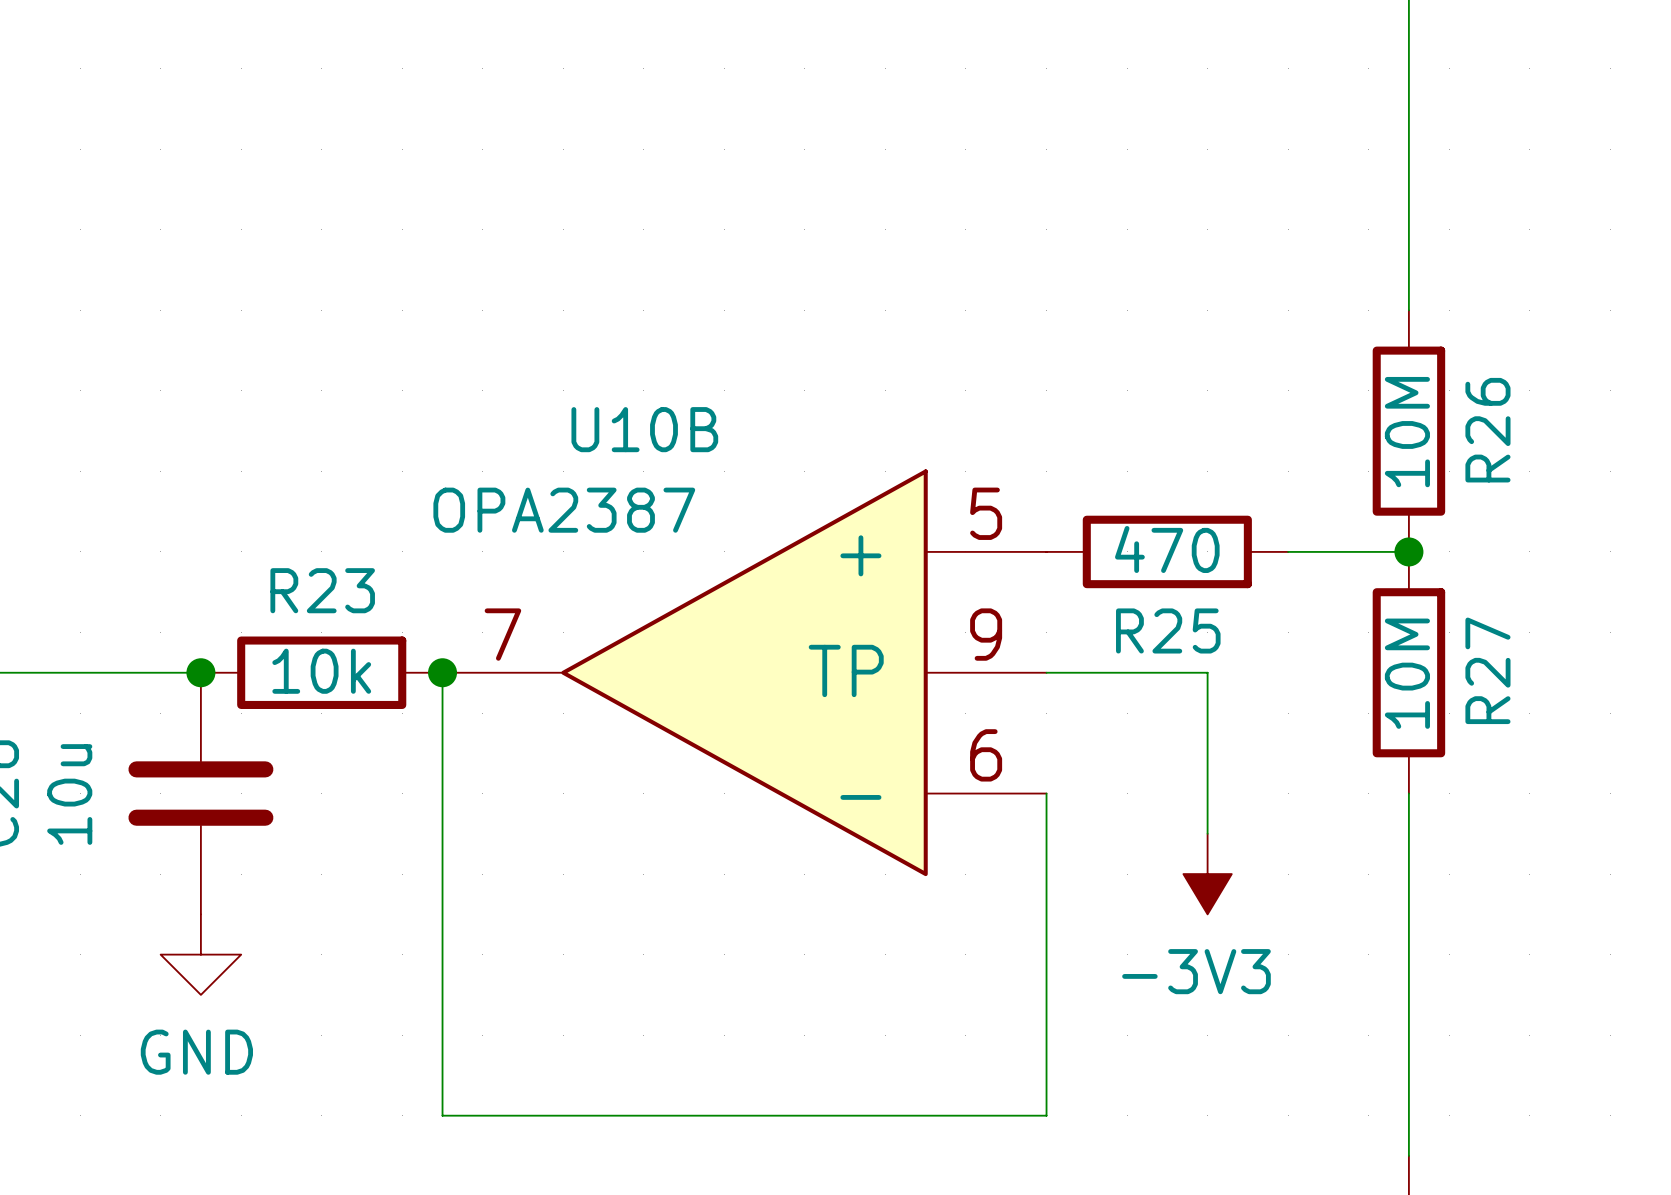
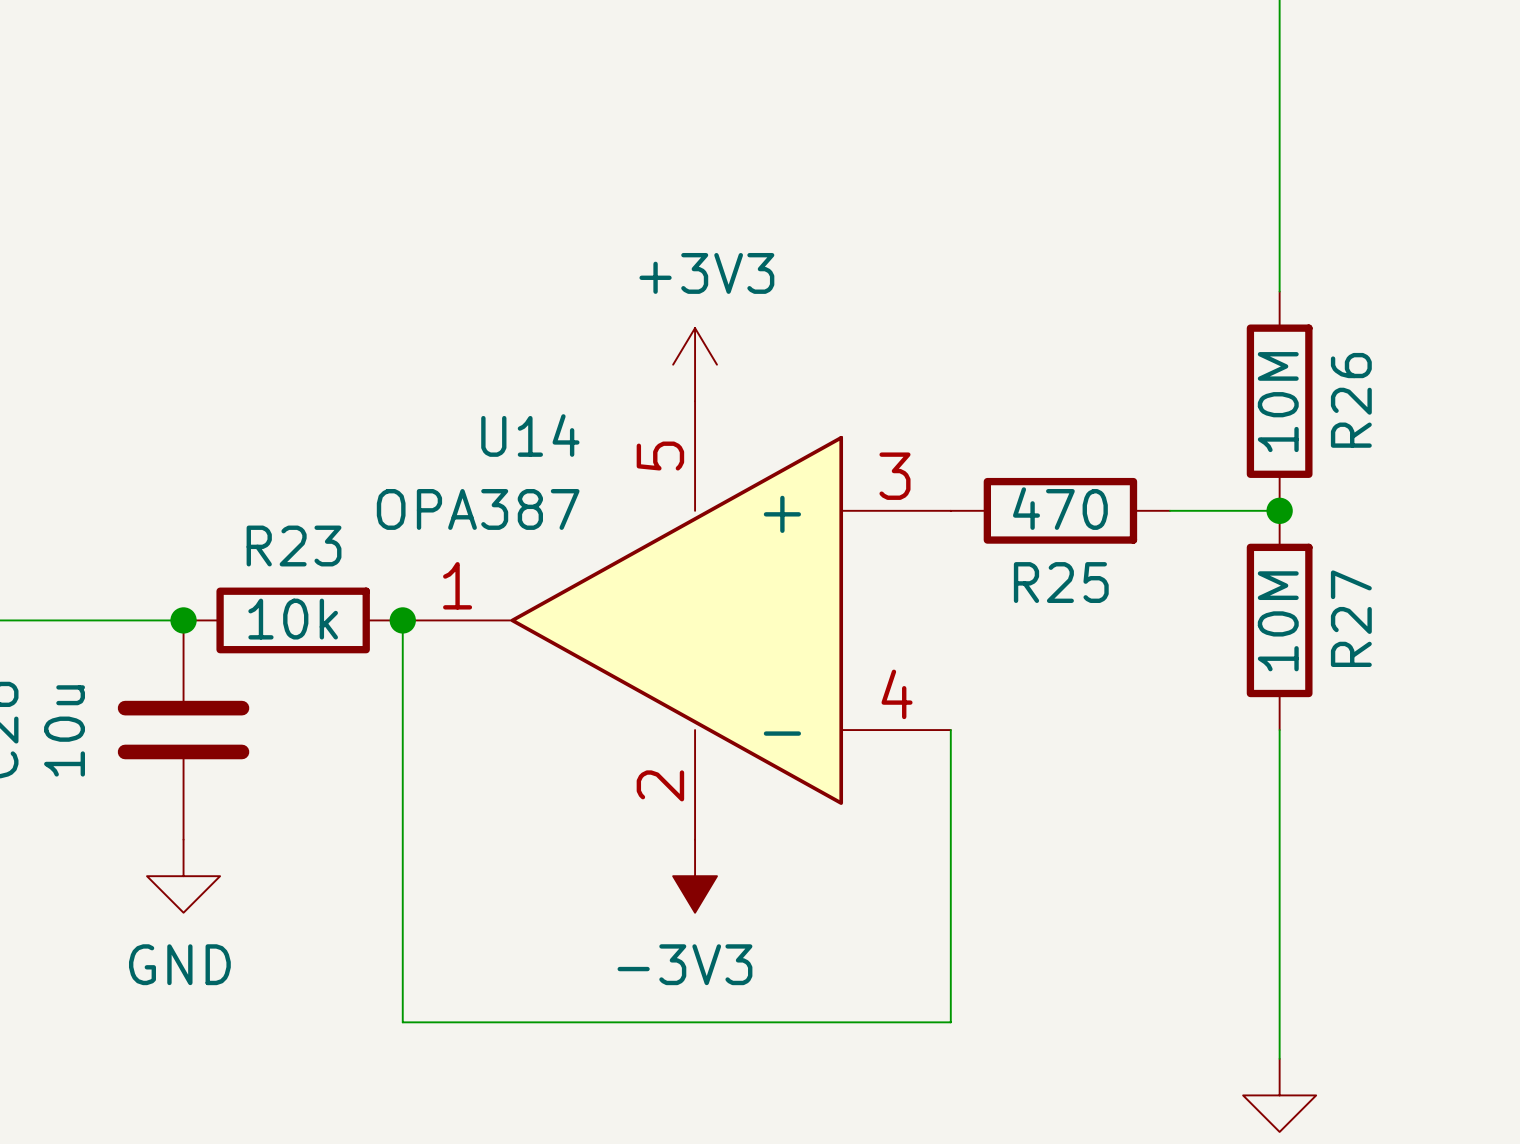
power symbol: none -> +3V3 (695, 364)
U10B: OPA2387 (744, 672) -> none
U14: none -> OPA387 (676, 620)
wire: (1046, 672) (1207, 672) (1207, 833) -> none
power symbol position: -3V3 (1207, 874) -> -3V3 (695, 876)

